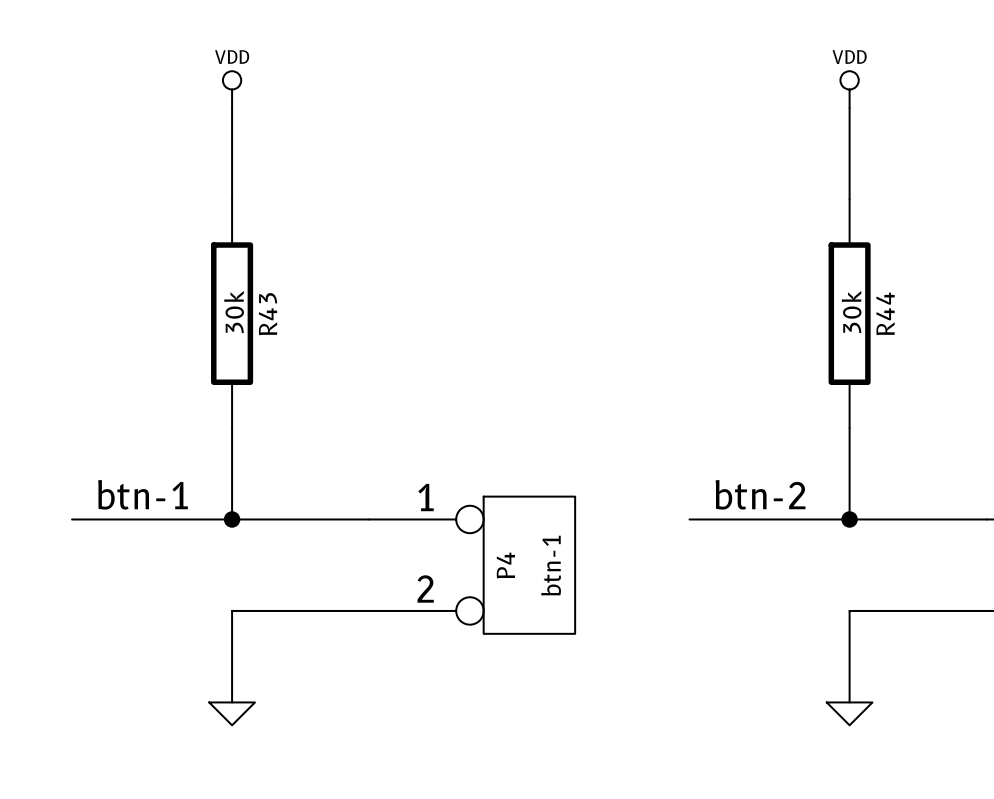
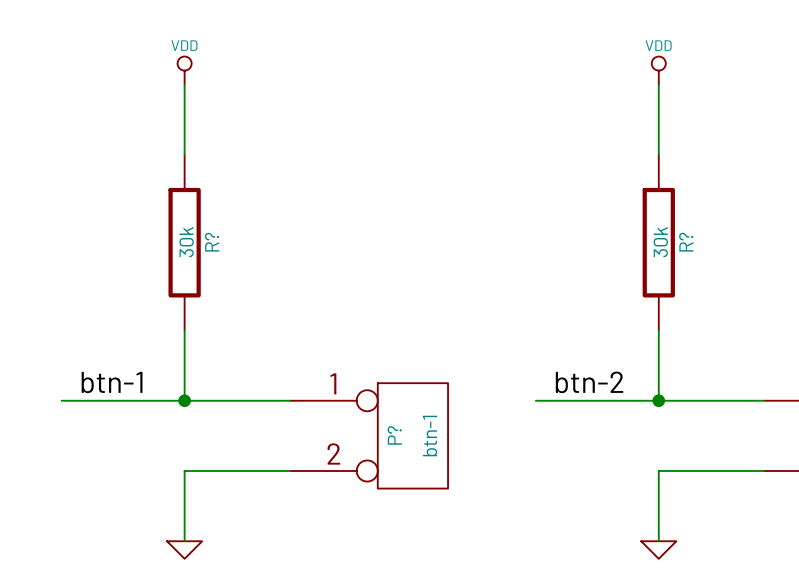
R44 name: R44 (885, 313) -> R? (686, 242)
R43 name: R43 (267, 314) -> R? (212, 242)
P4 name: P4 (505, 565) -> P? (394, 435)

